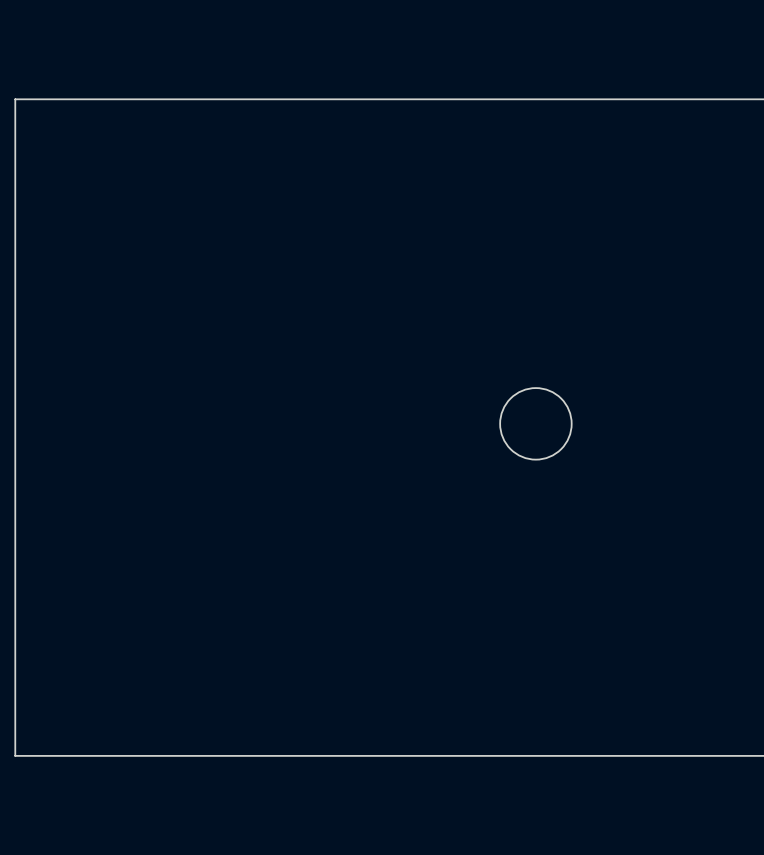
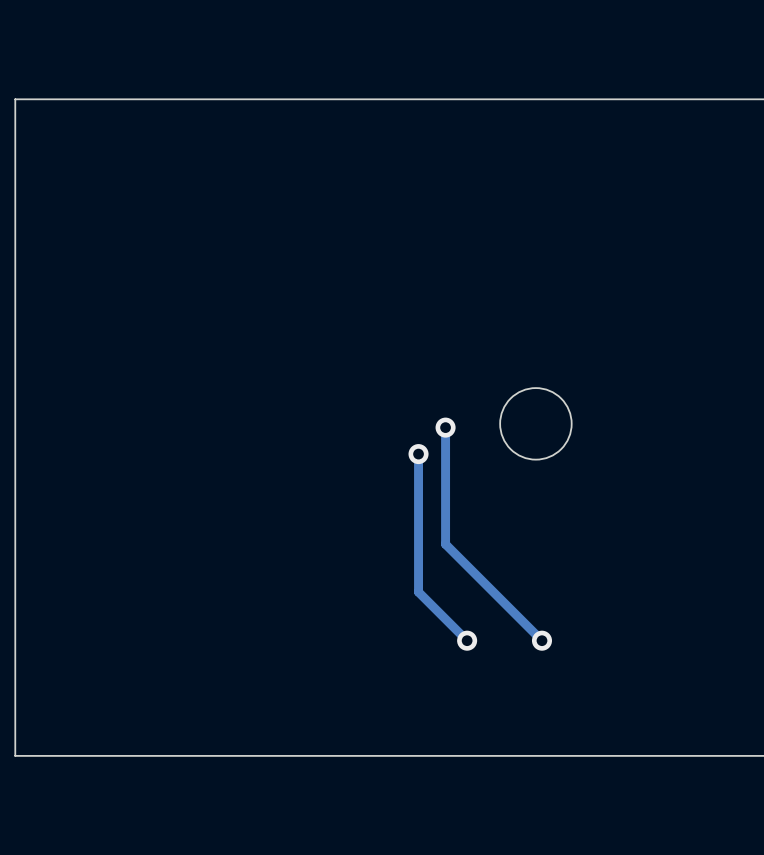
track: none -> (445, 427) (445, 544) (541, 640)
via: none -> (445, 427)
track: none -> (418, 454) (418, 592) (467, 640)
via: none -> (418, 454)
via: none -> (467, 640)
via: none -> (541, 640)

